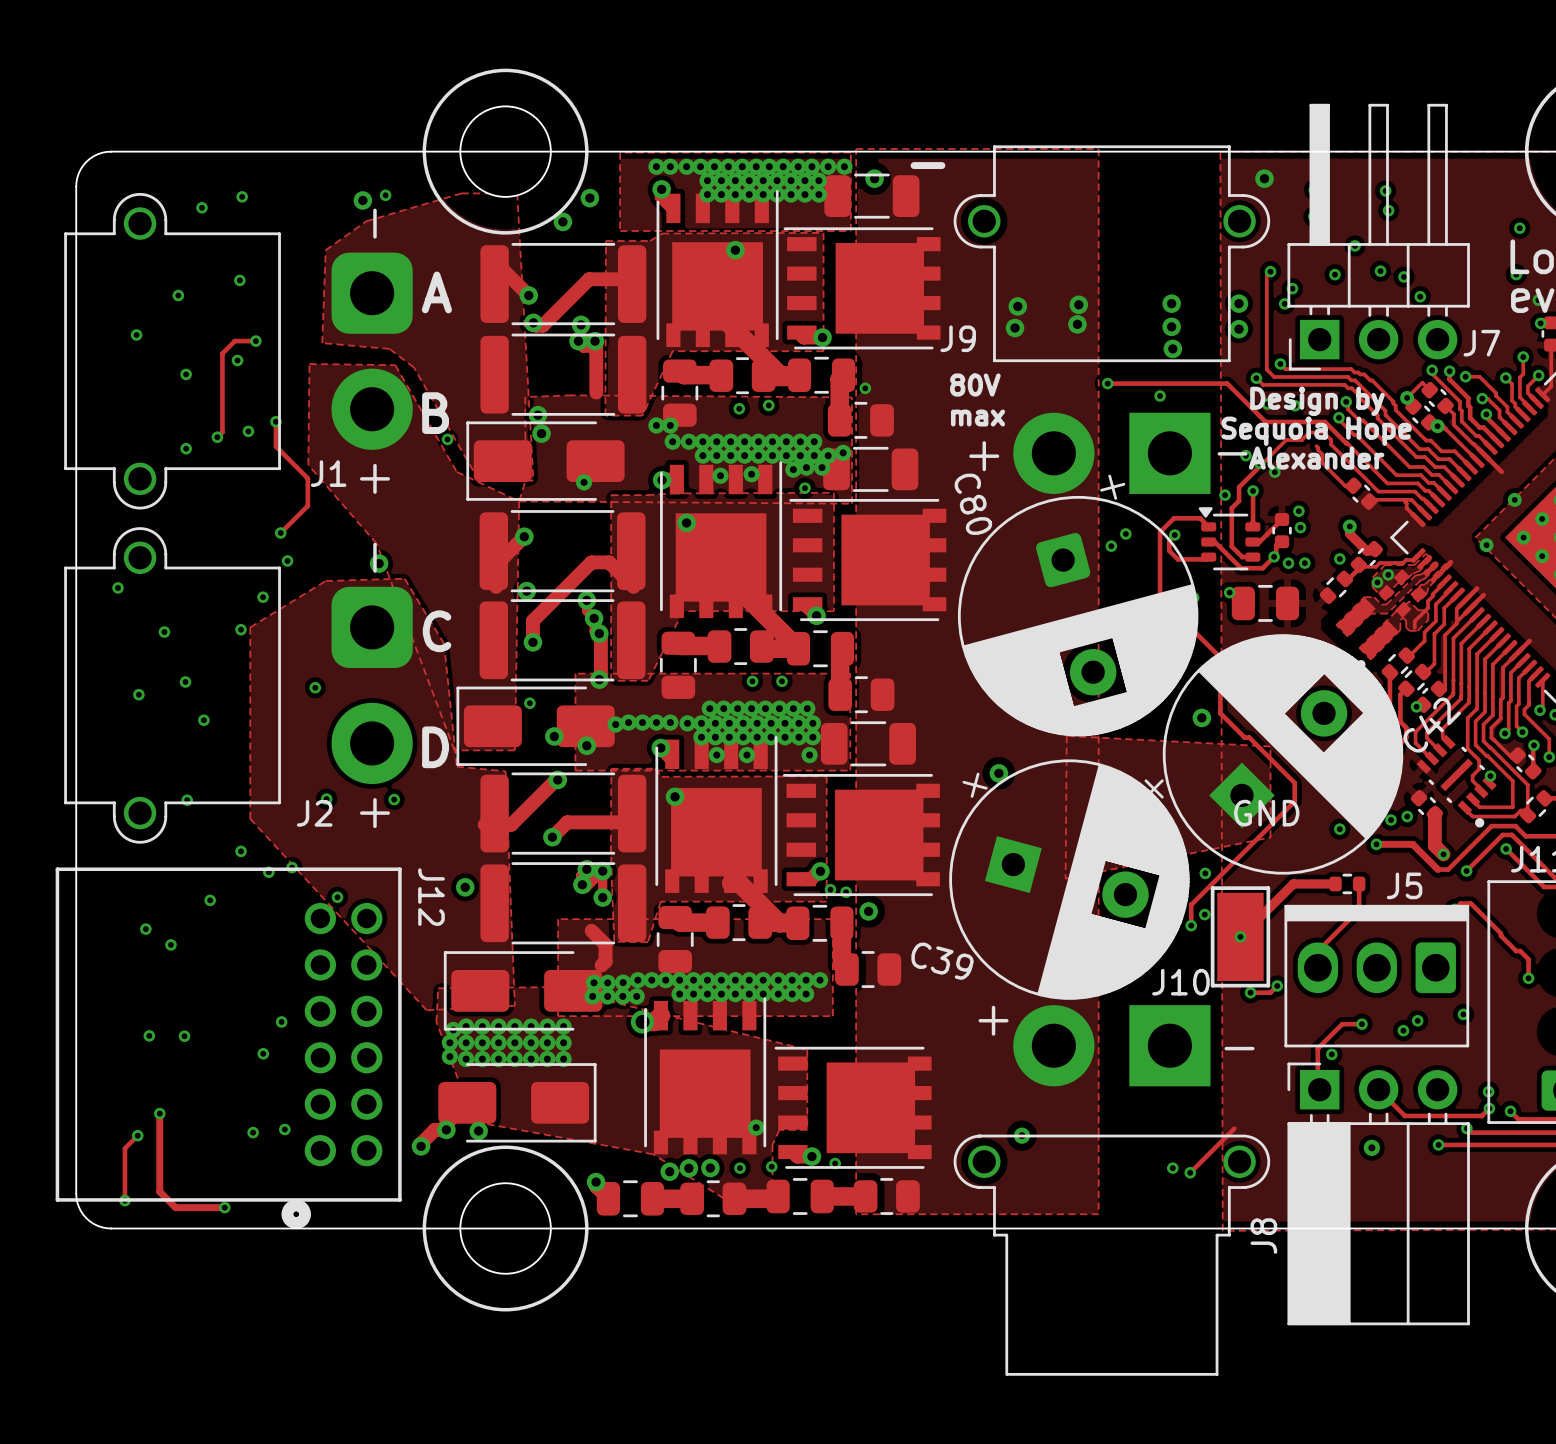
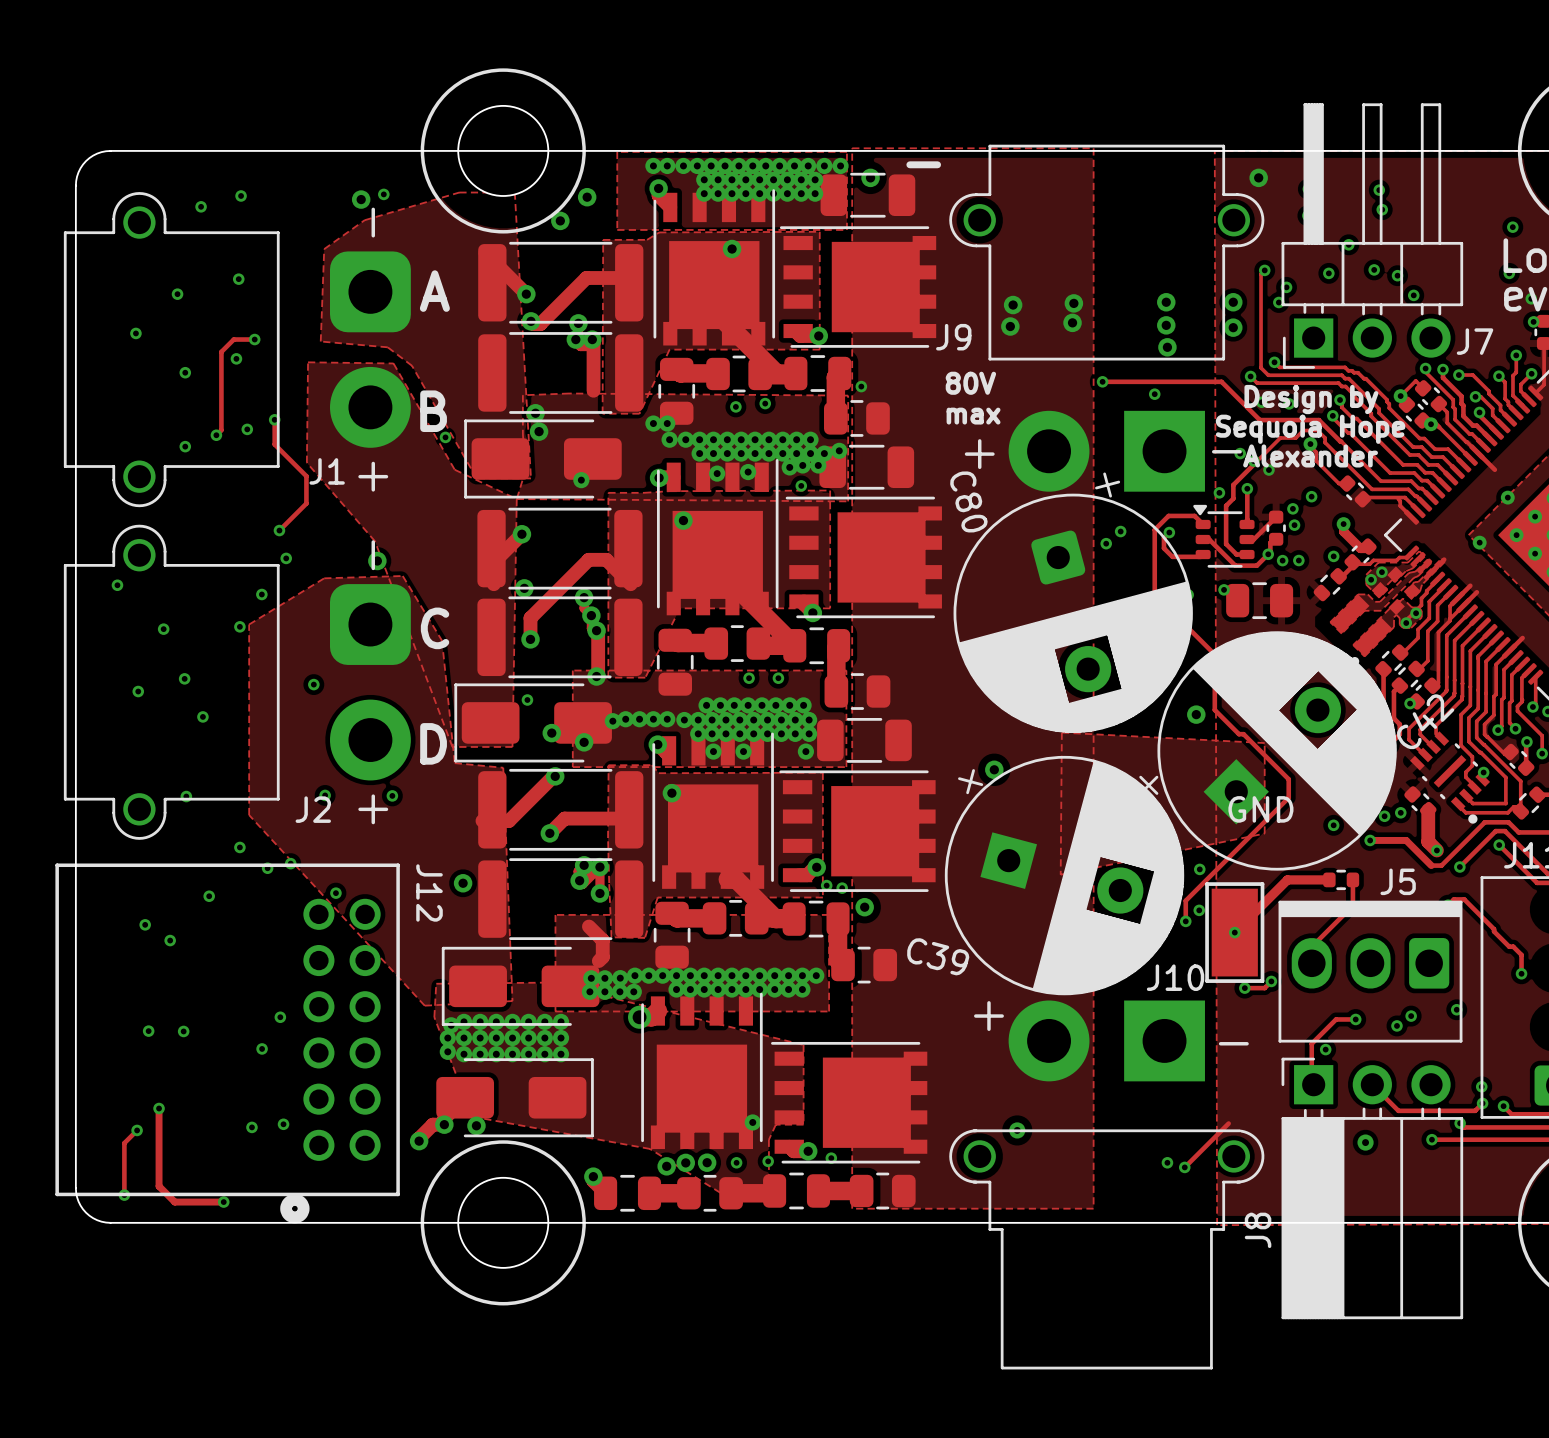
via: none -> (1310, 444)
via: none -> (1311, 496)
via: none -> (1416, 613)
via: none -> (1406, 623)

